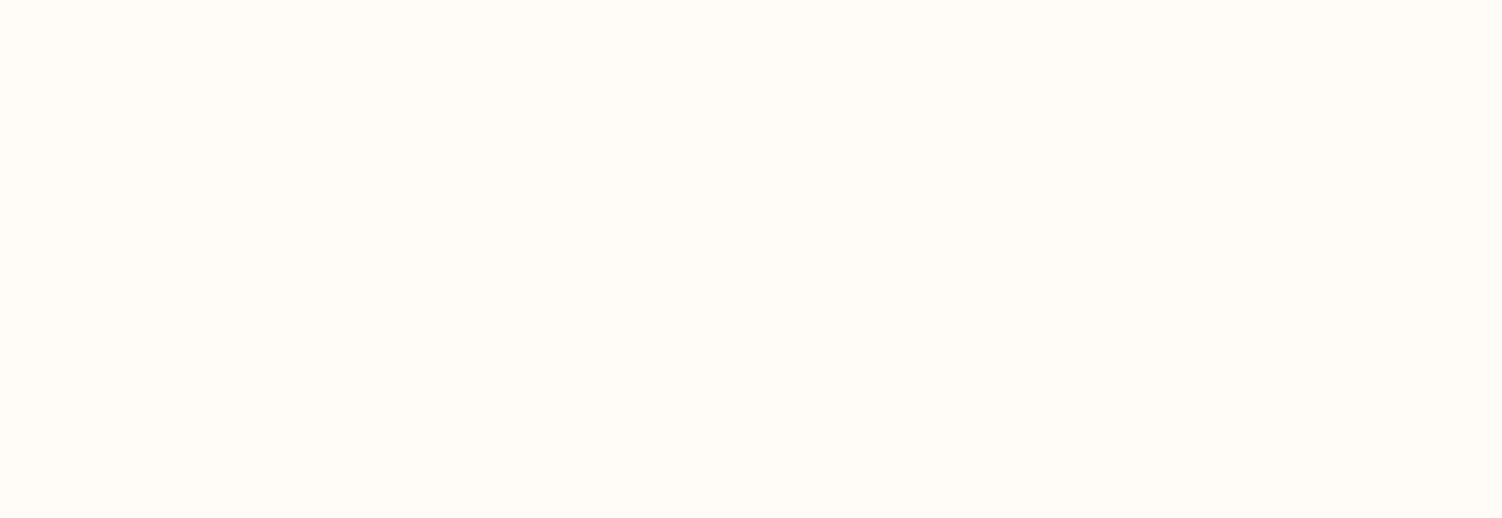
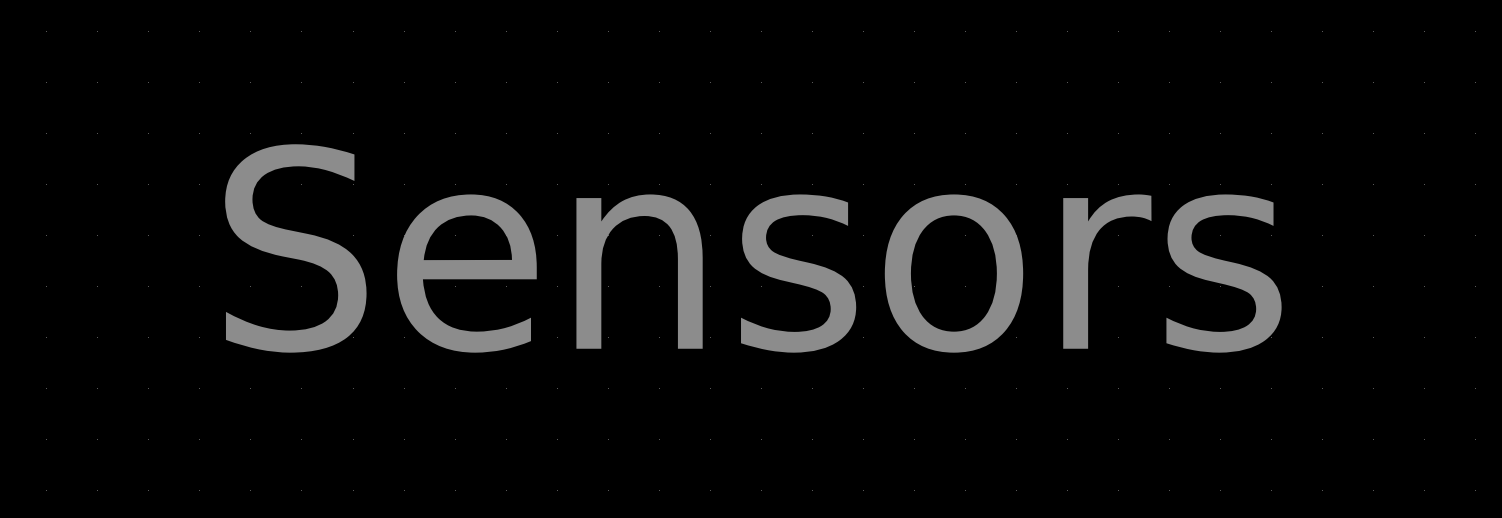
text: none -> Sensors (753, 248)

